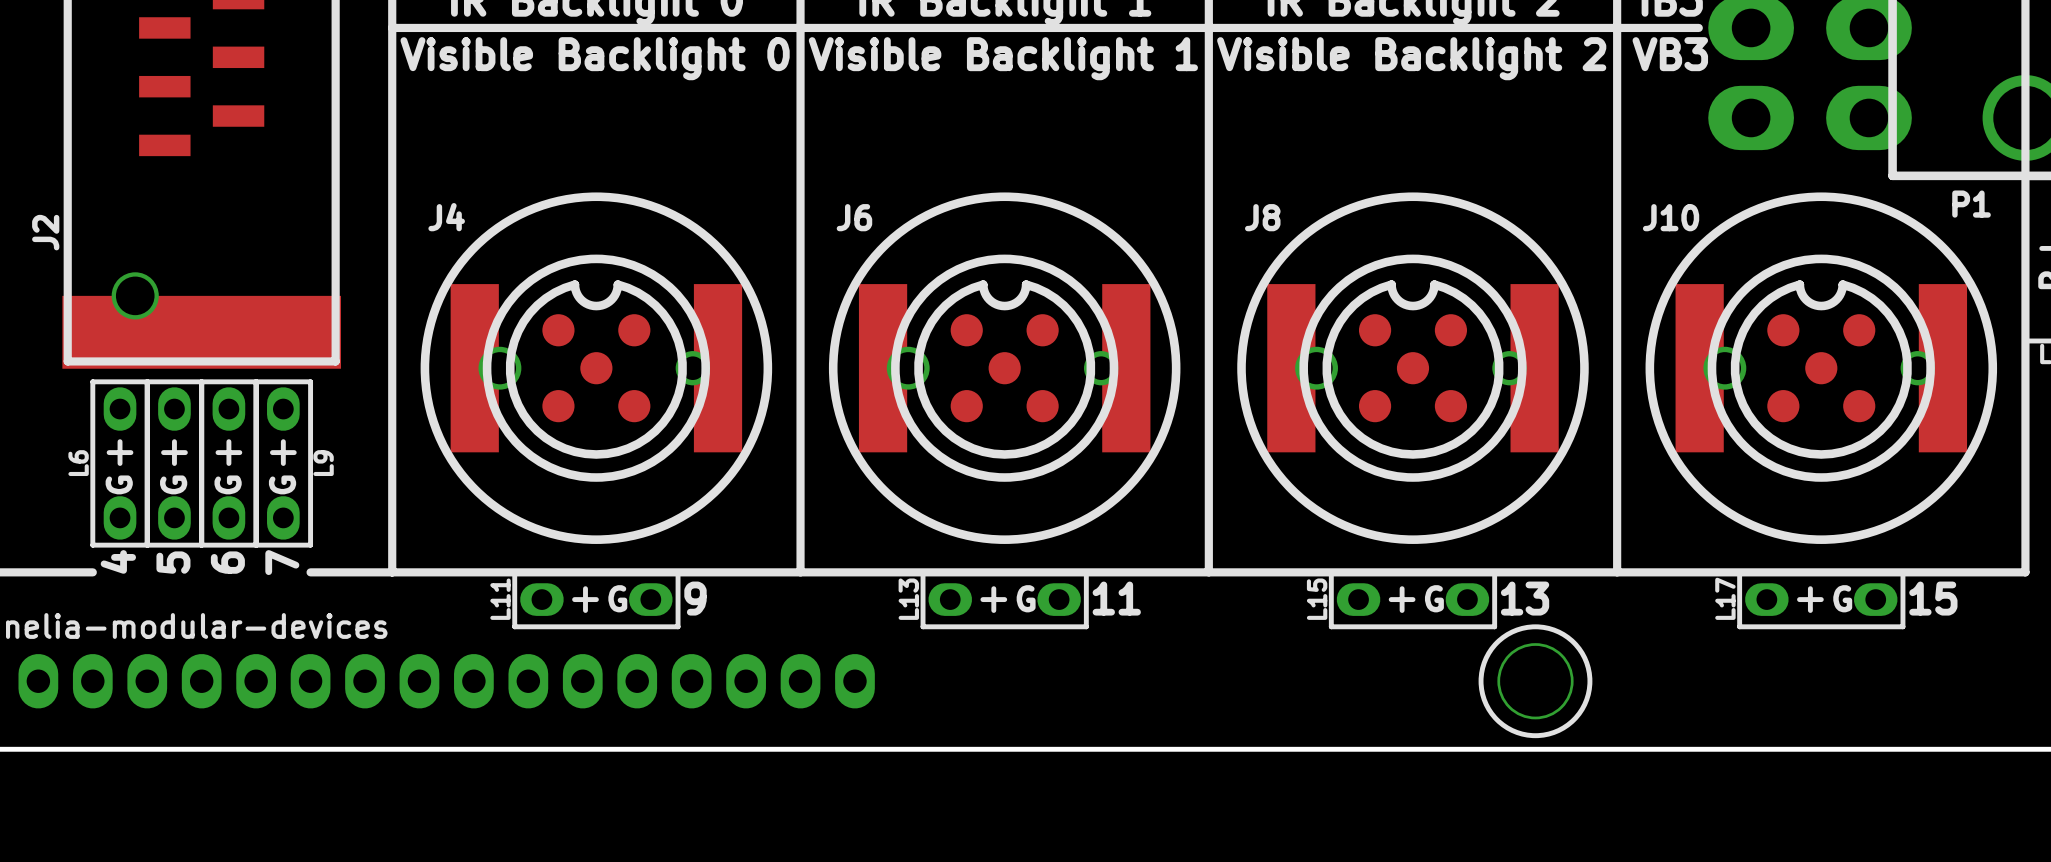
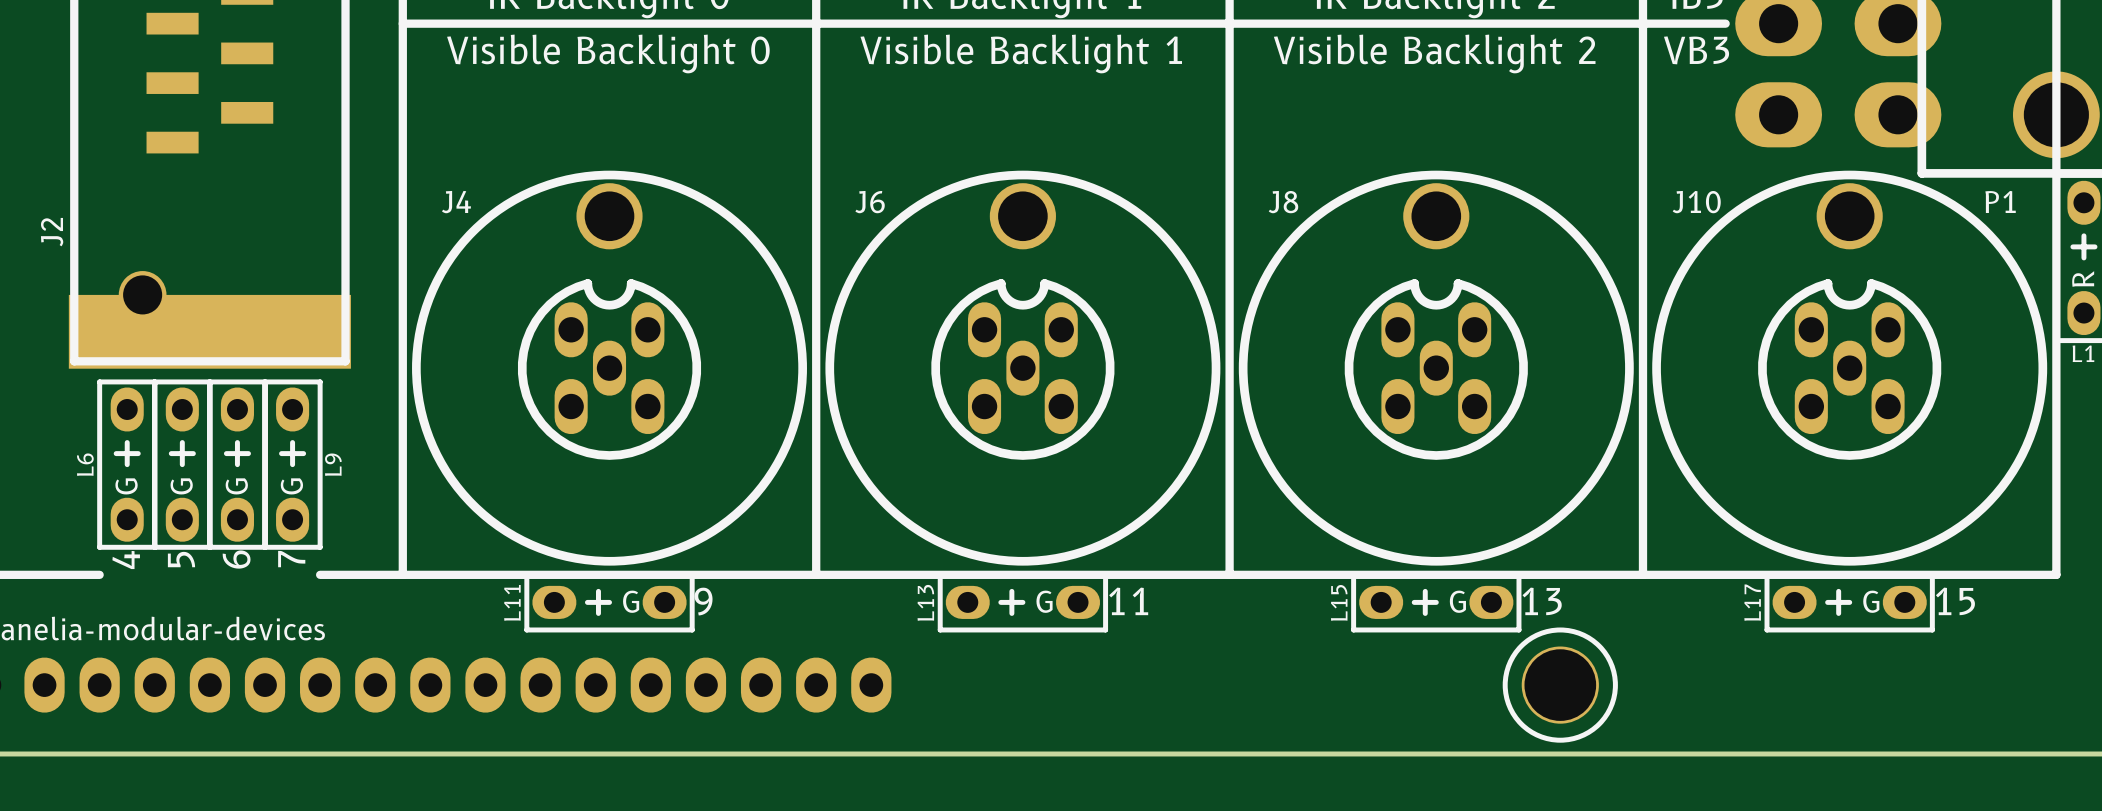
J4 footprint: [420, 192, 773, 544] -> [412, 170, 807, 566]
J6 footprint: [828, 192, 1181, 544] -> [825, 170, 1221, 566]
J8 footprint: [1237, 192, 1589, 544] -> [1238, 170, 1634, 566]
J10 footprint: [1645, 192, 1998, 544] -> [1652, 170, 2048, 566]

